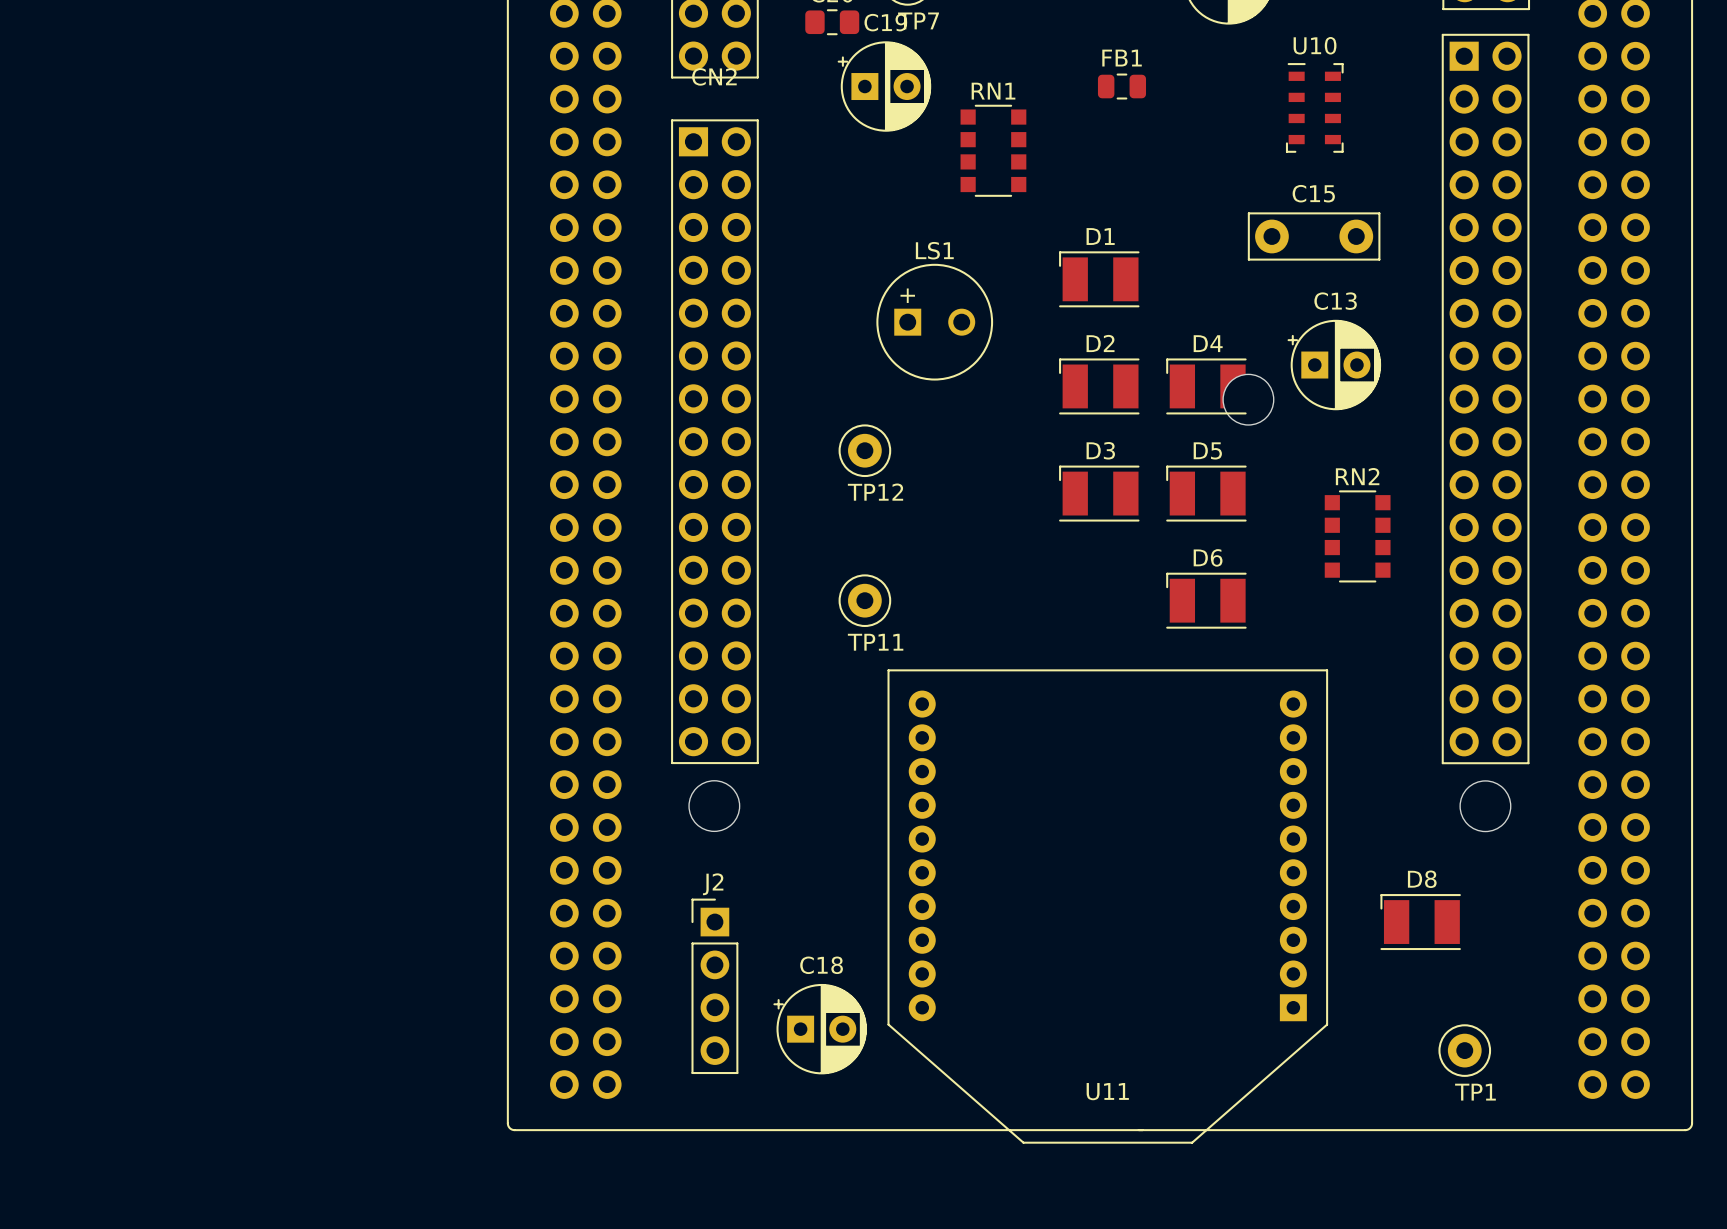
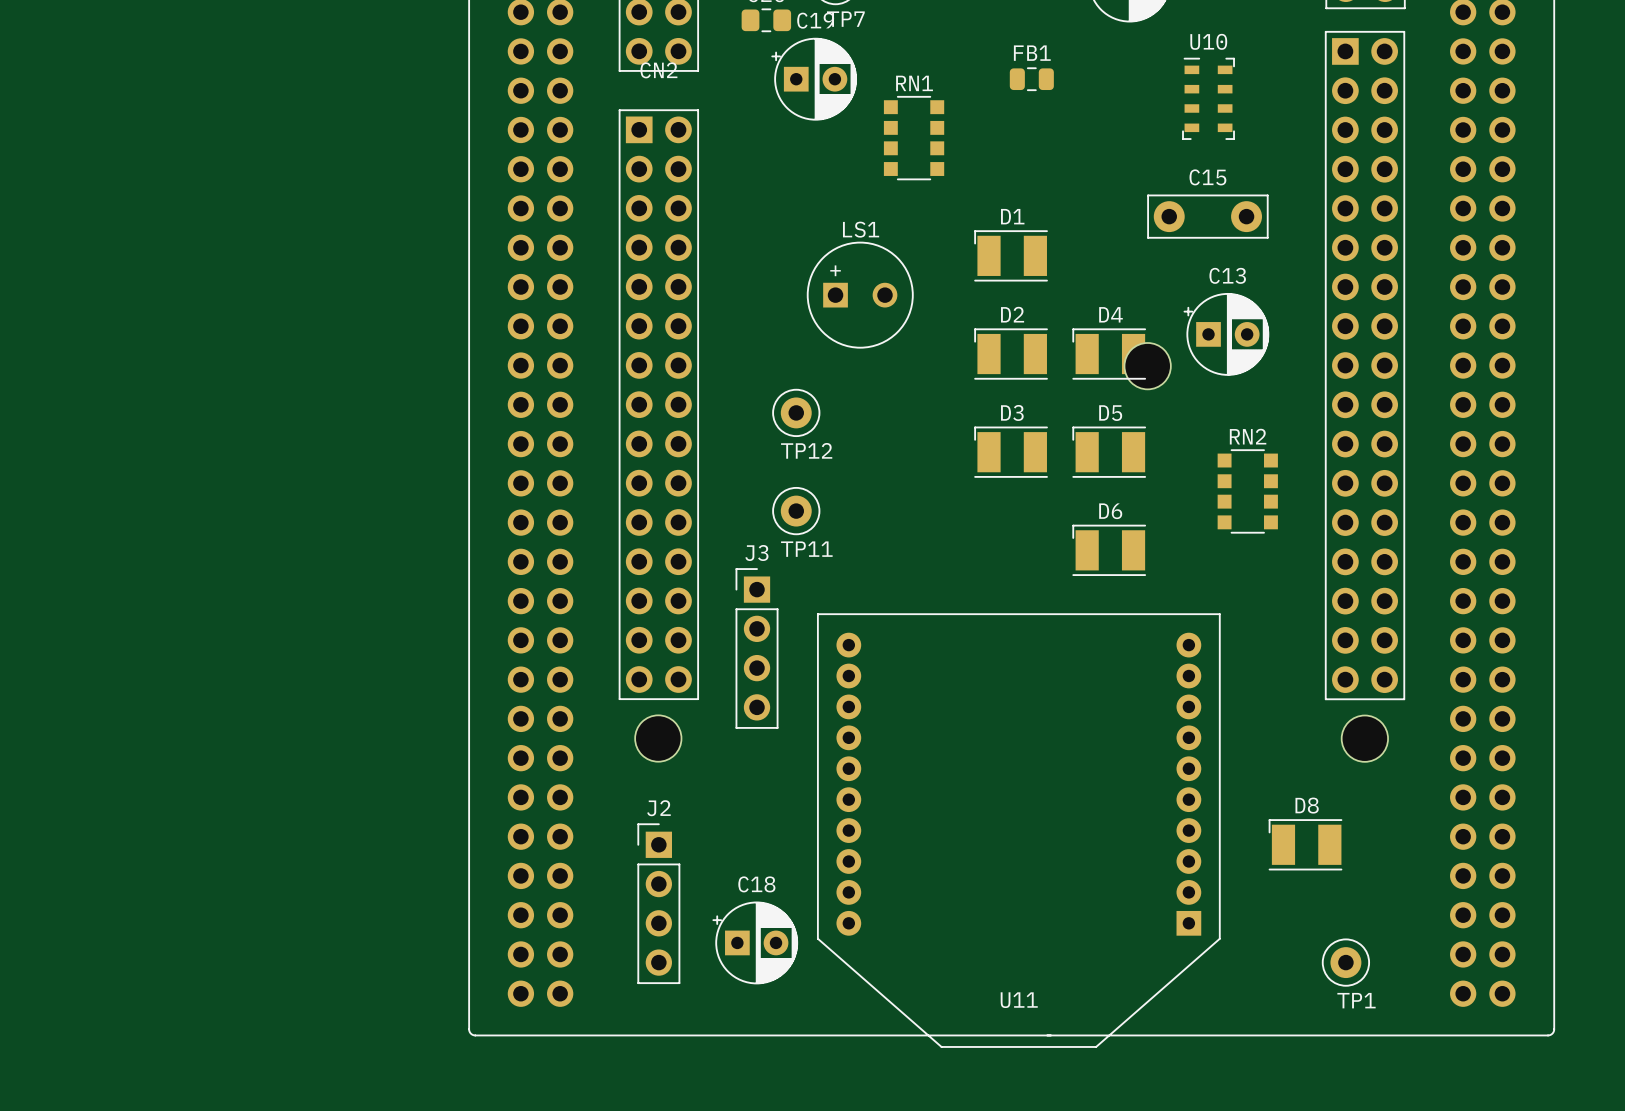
TP11 position: (864, 600) -> (796, 511)
J3: none -> (757, 648)

